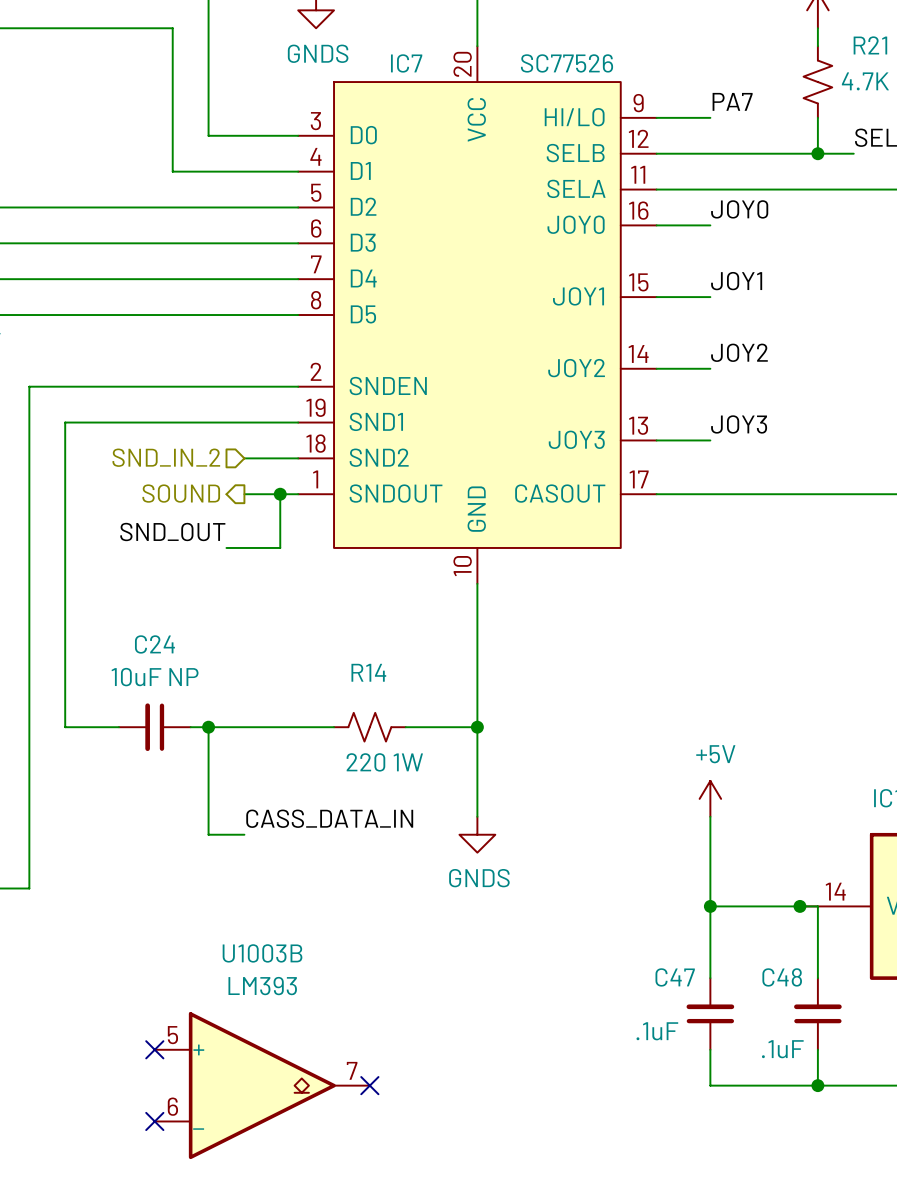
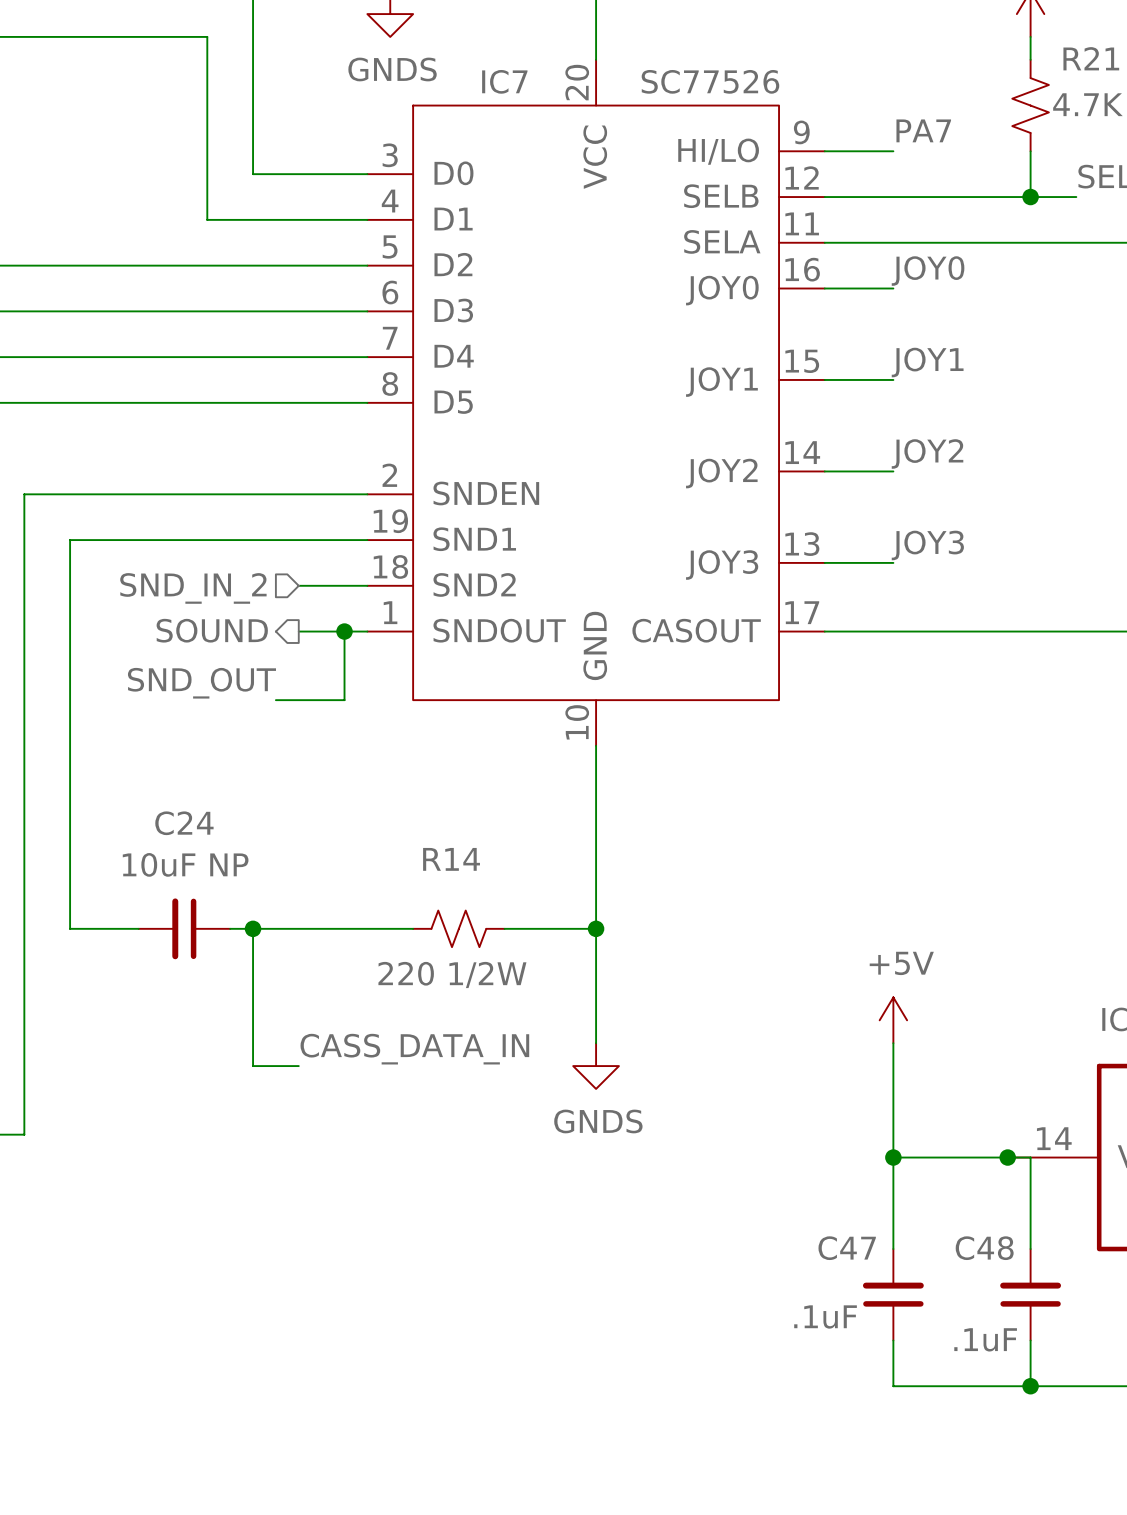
R14 value: 220 1W (384, 762) -> 220 1/2W (452, 974)
no-connect mark: (154, 1049) -> none
U1003B: LM393 (262, 1085) -> none
no-connect mark: (369, 1085) -> none
no-connect mark: (154, 1121) -> none

